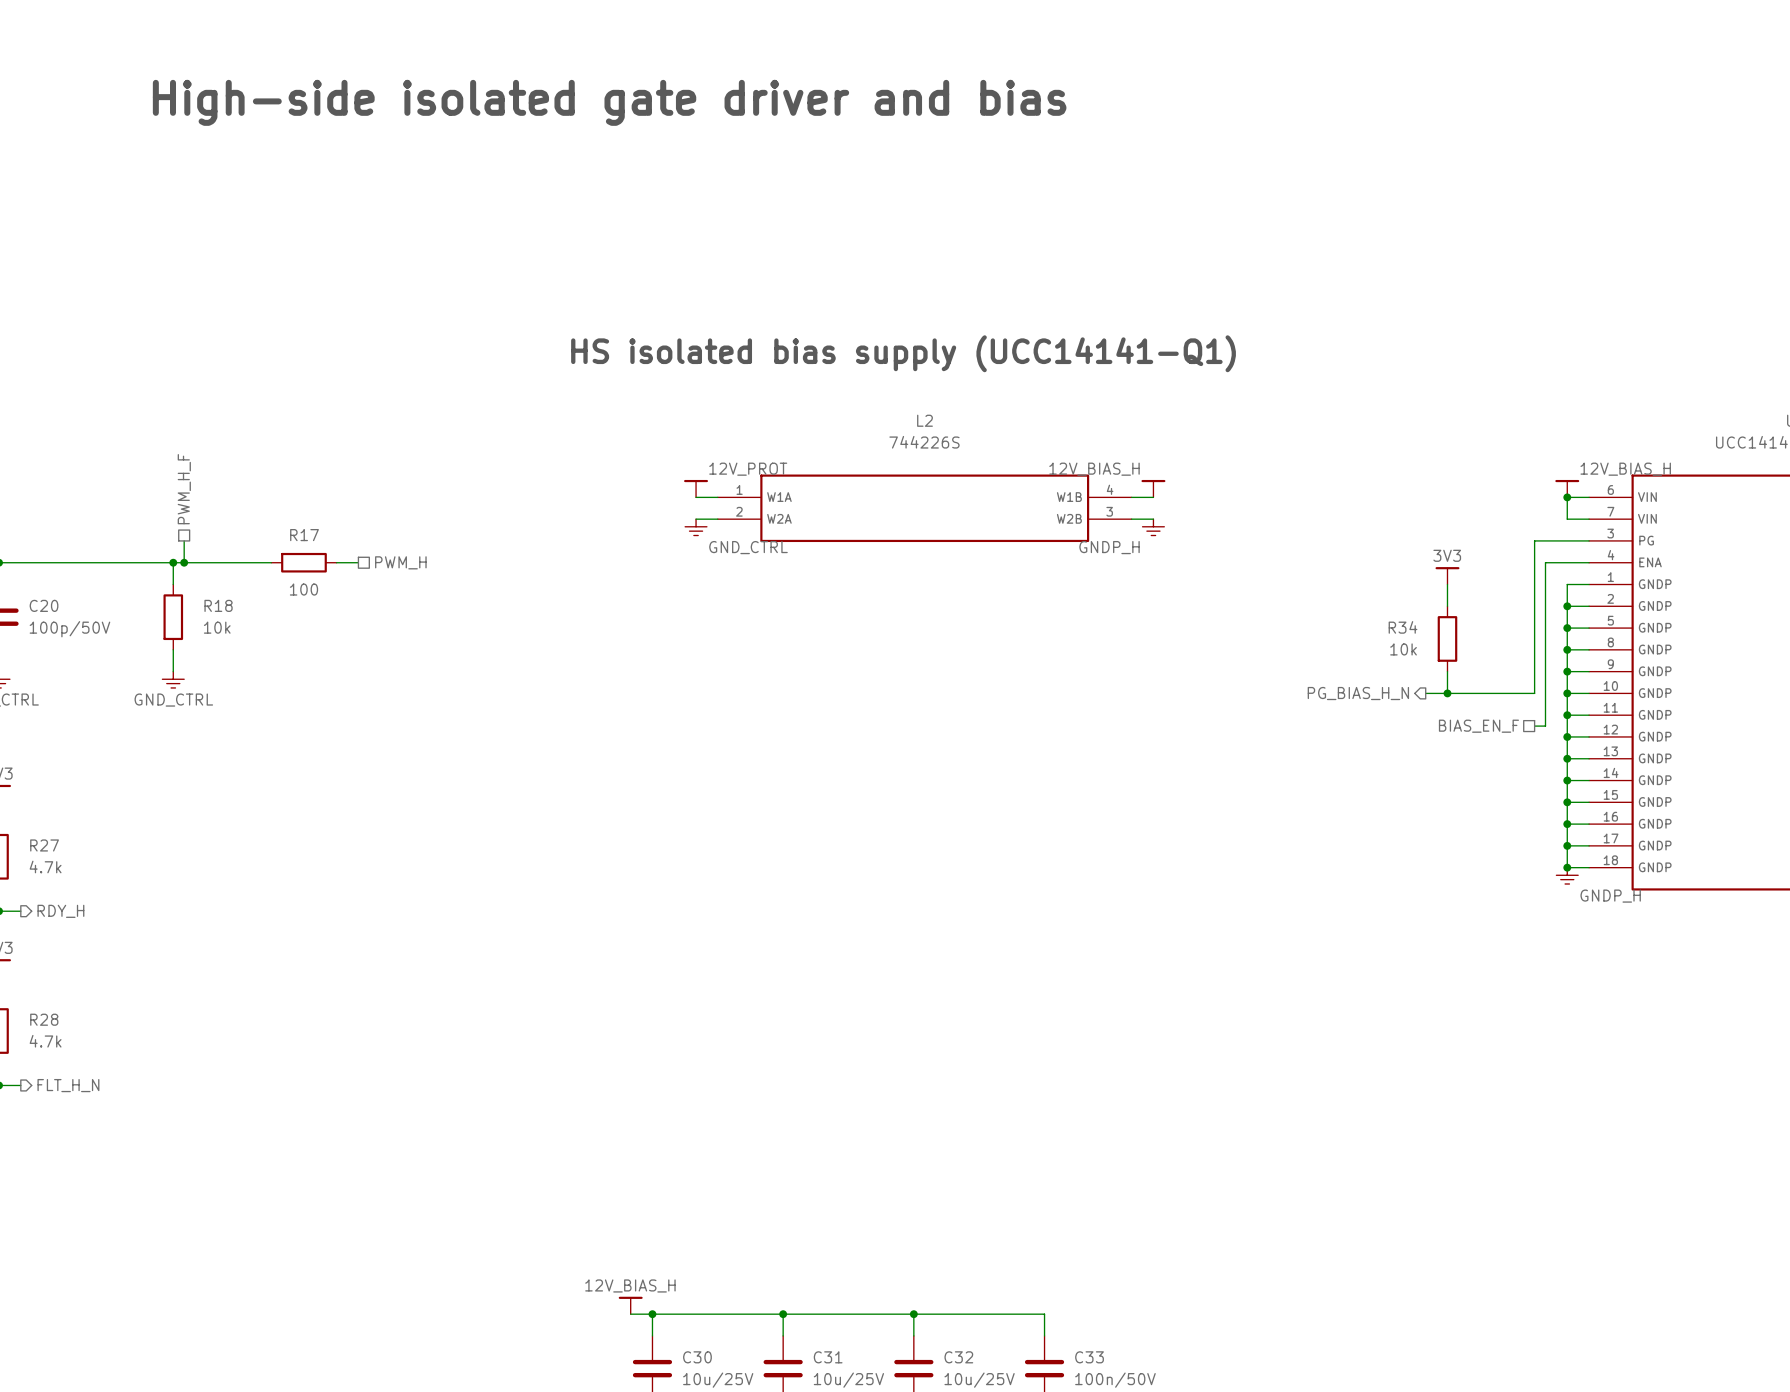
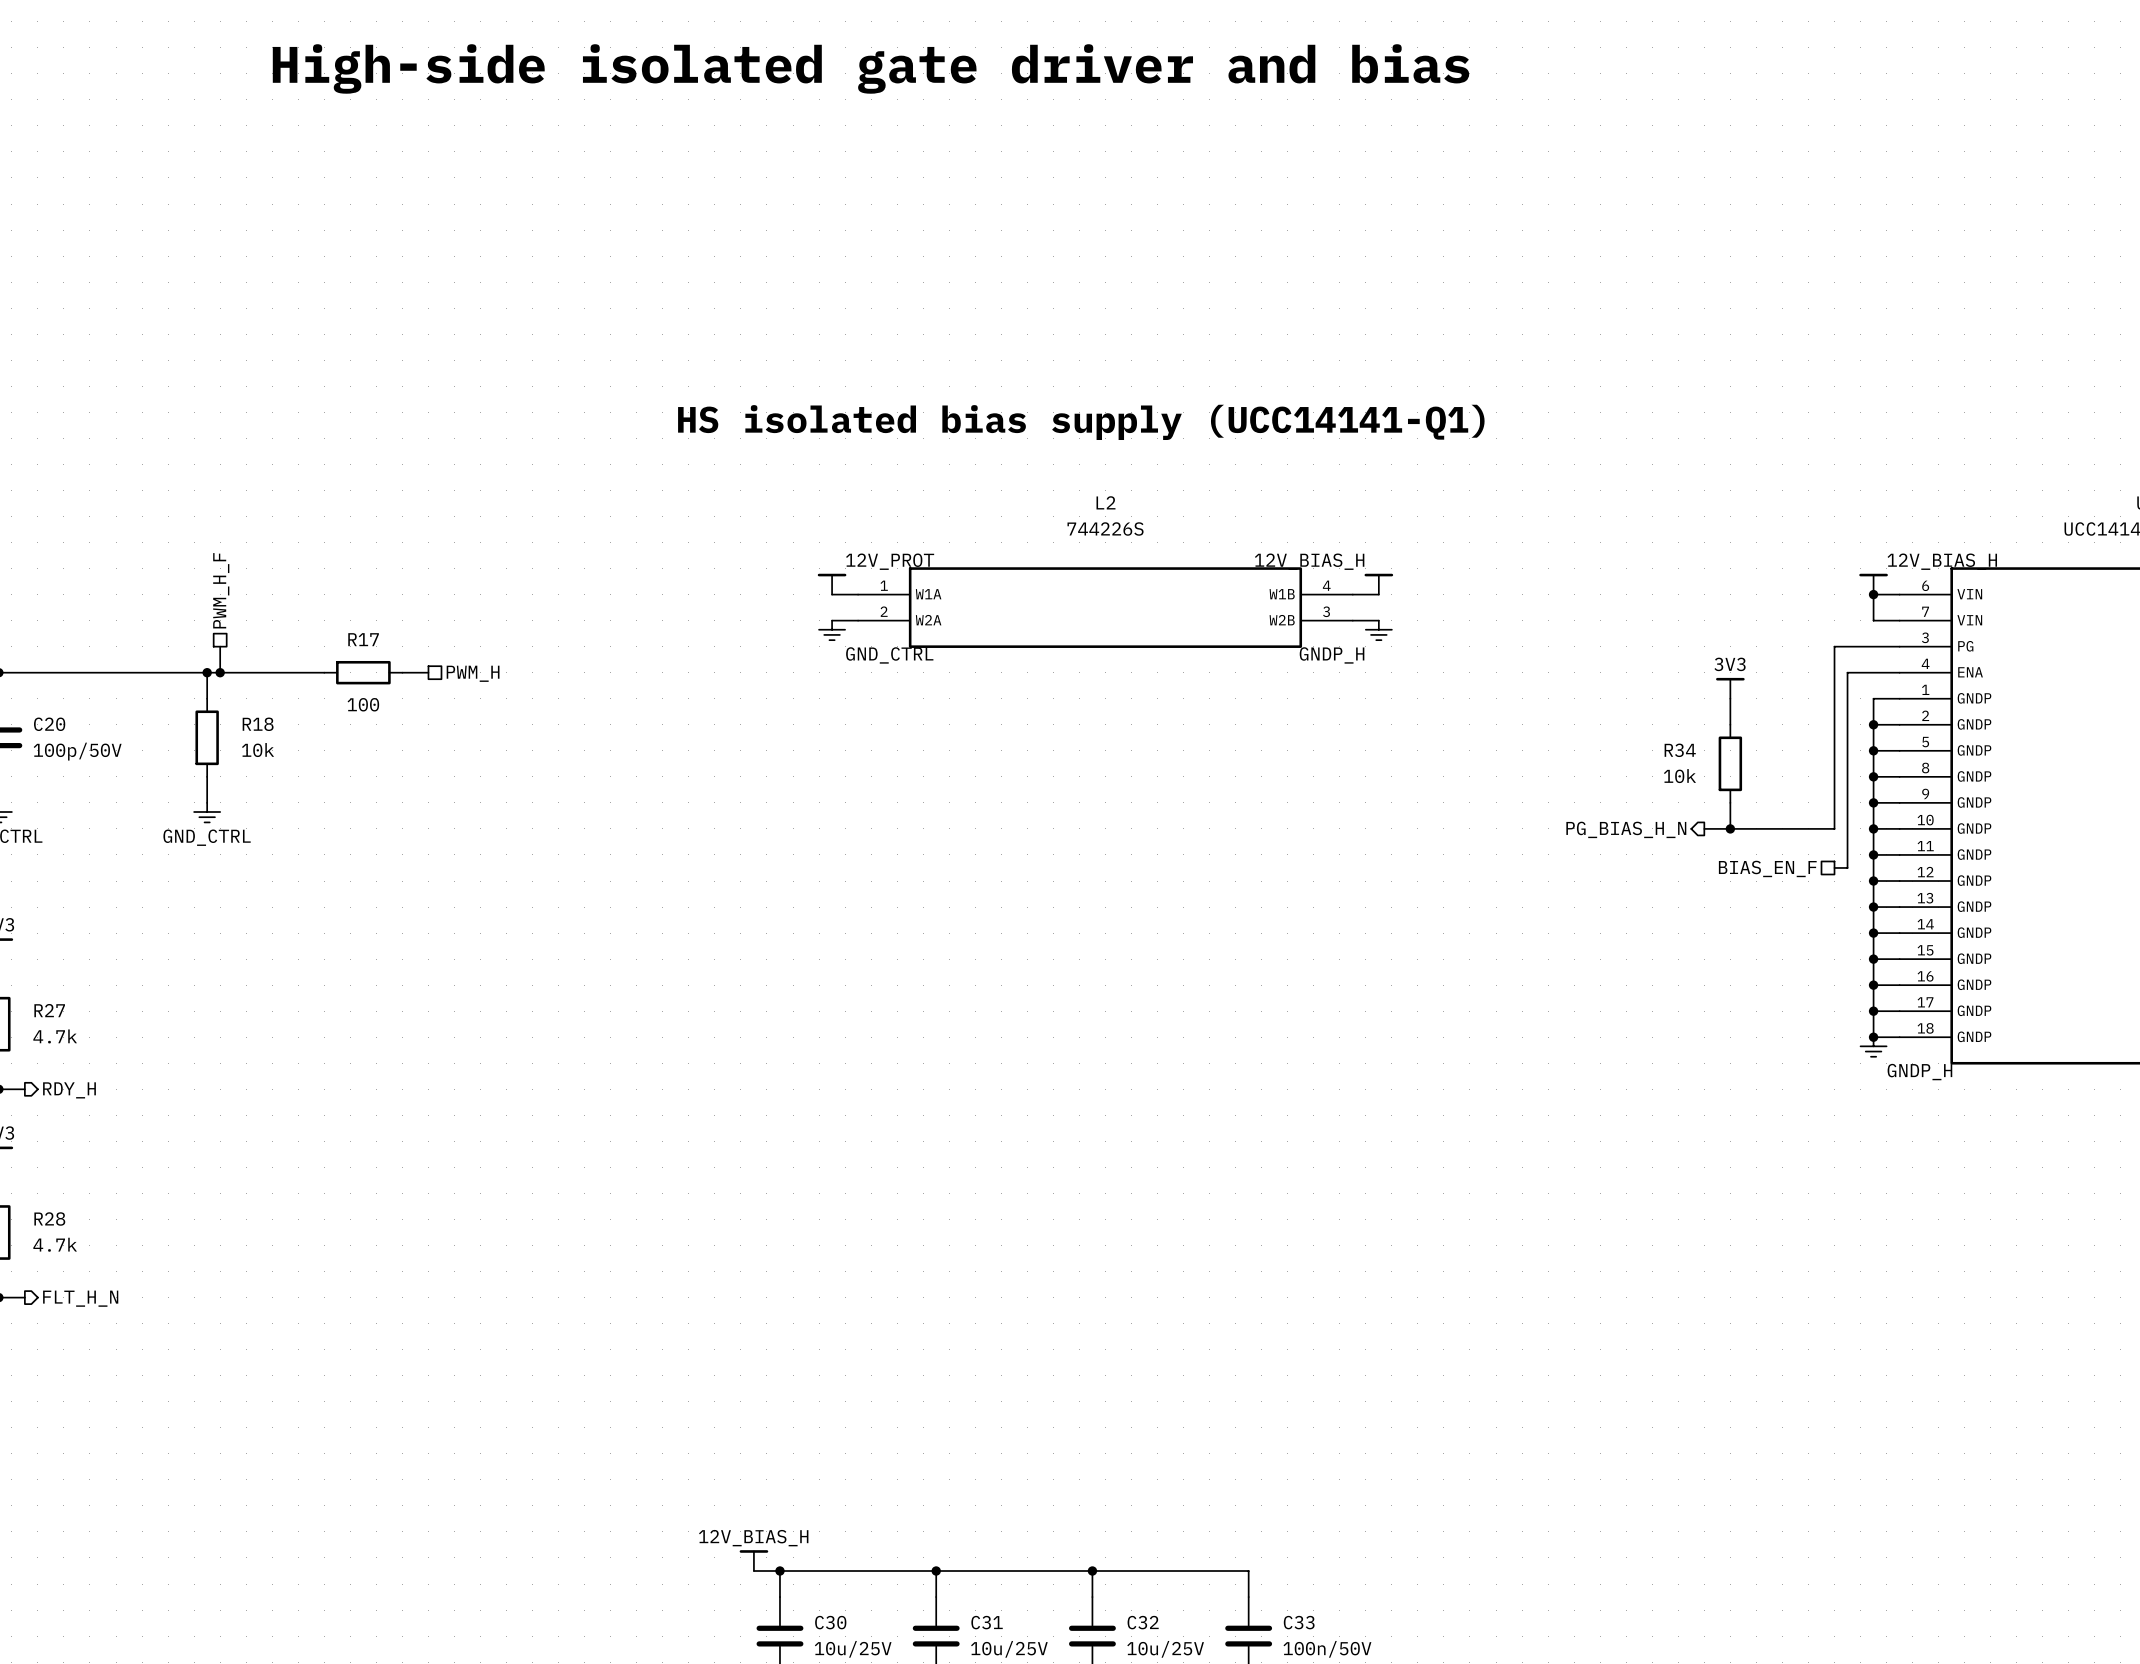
text position: High-side isolated gate driver and bias (609, 102) -> High-side isolated gate driver and bias (870, 68)

